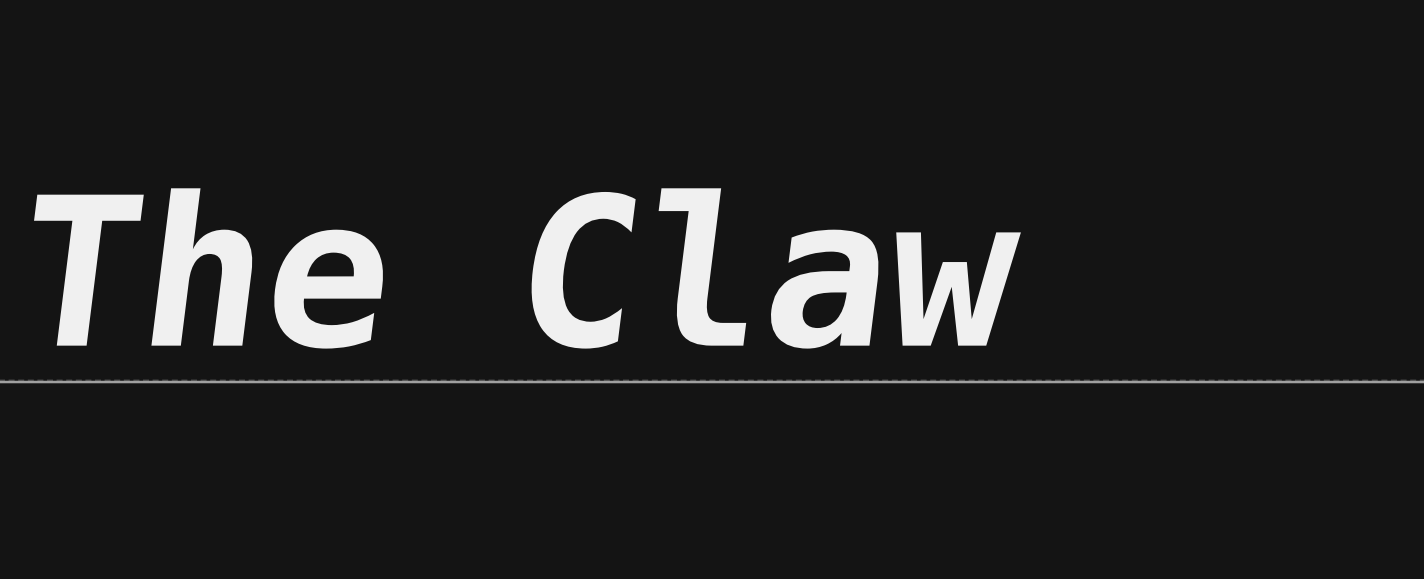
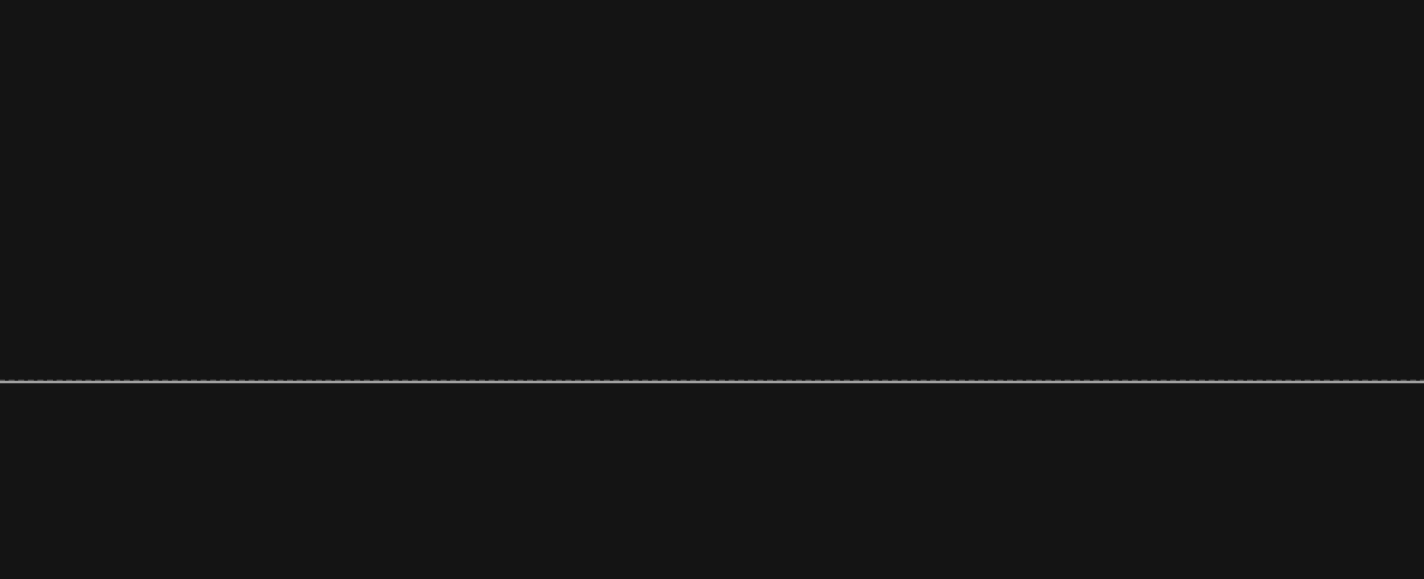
text: The Claw (527, 268) -> none

